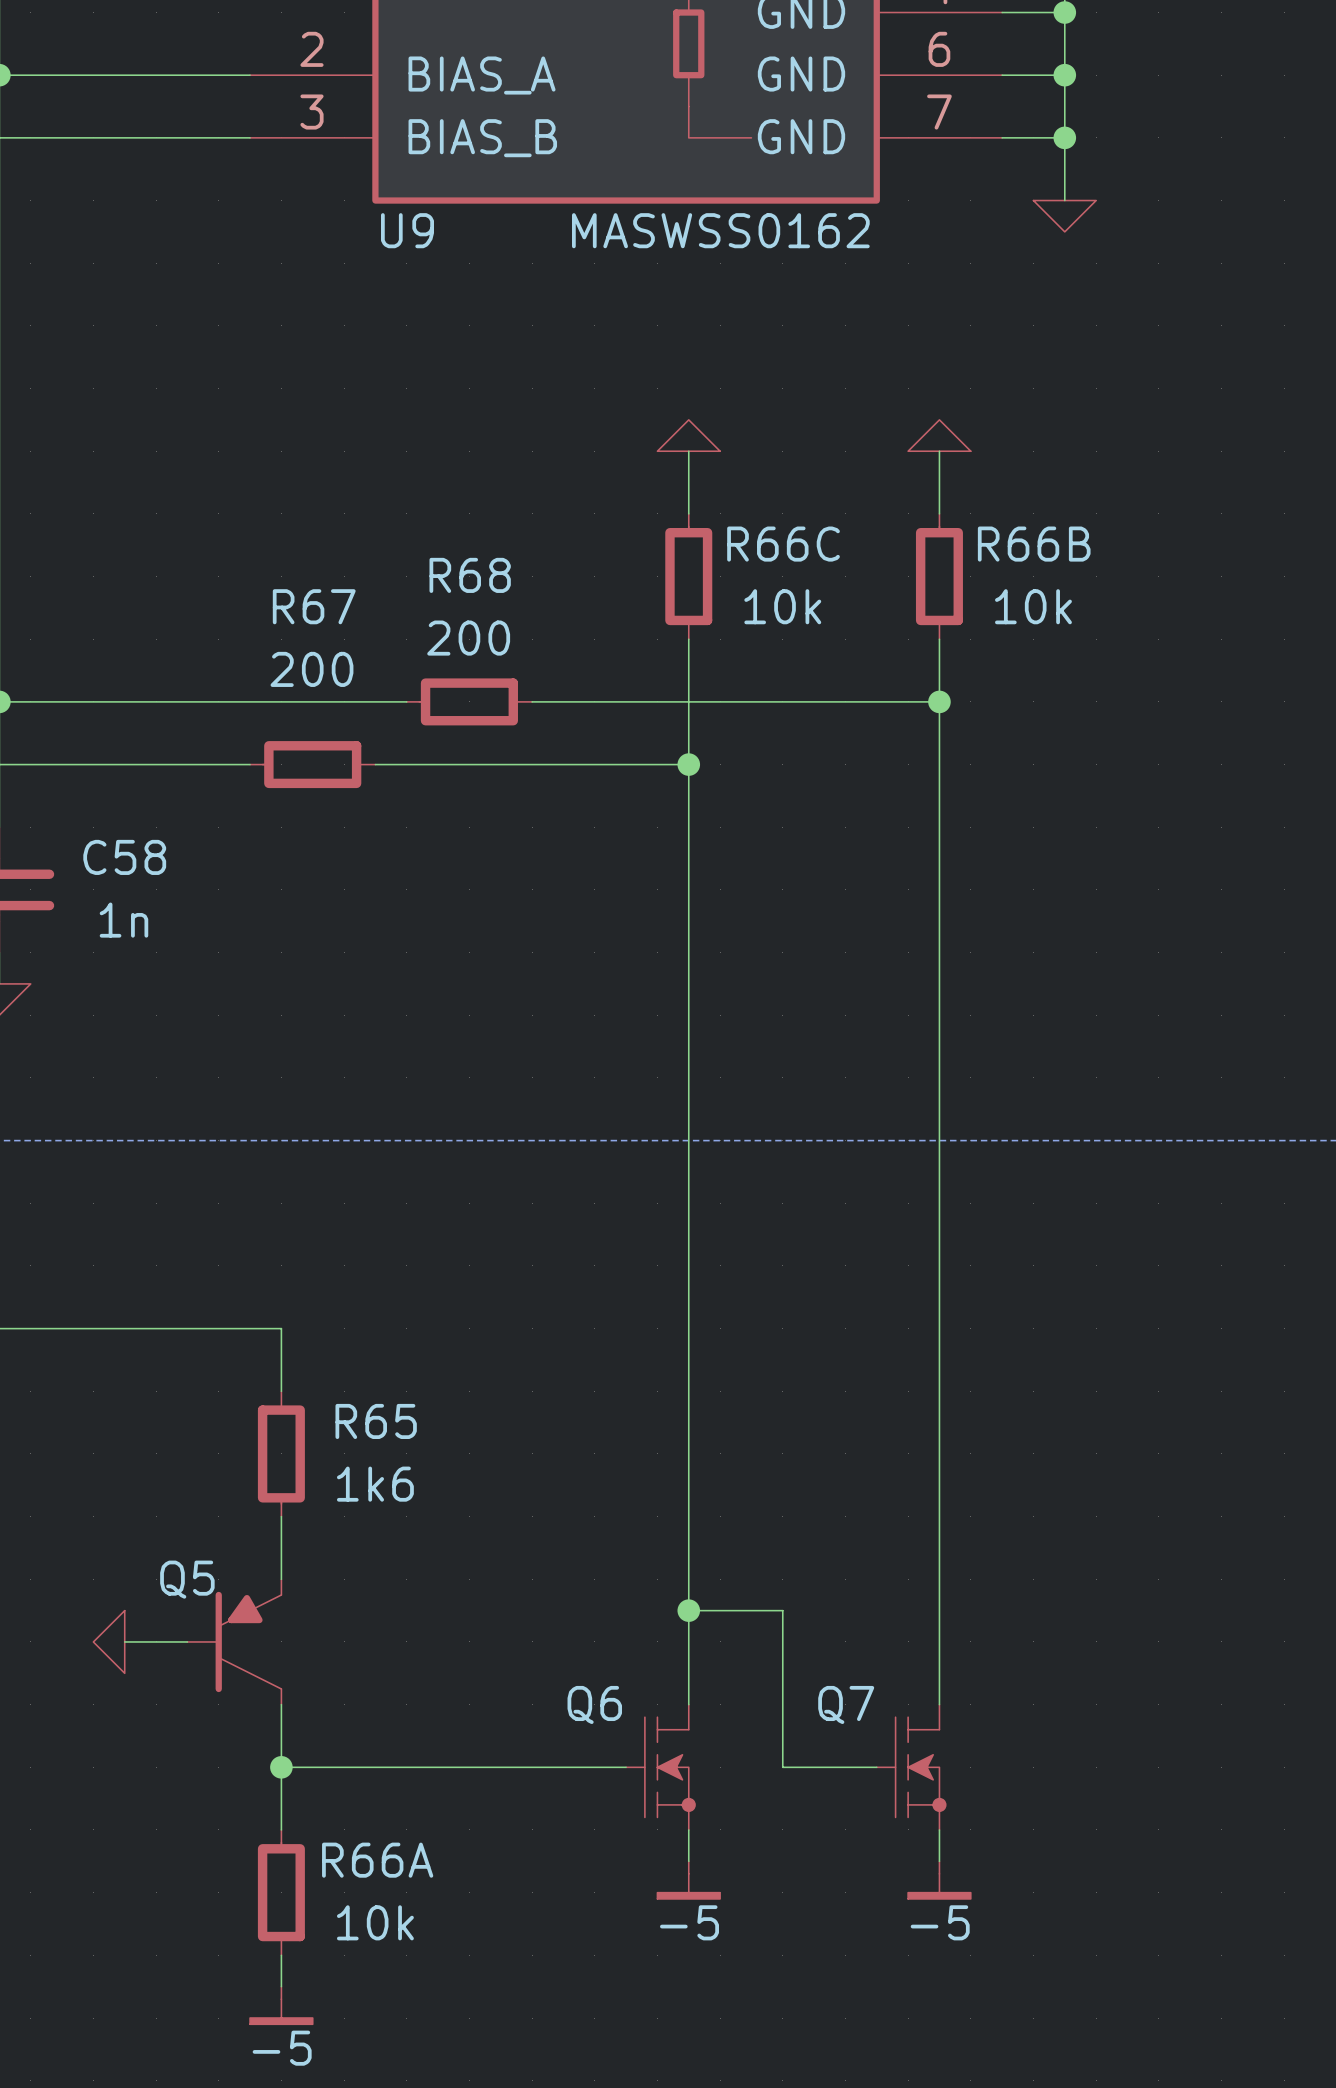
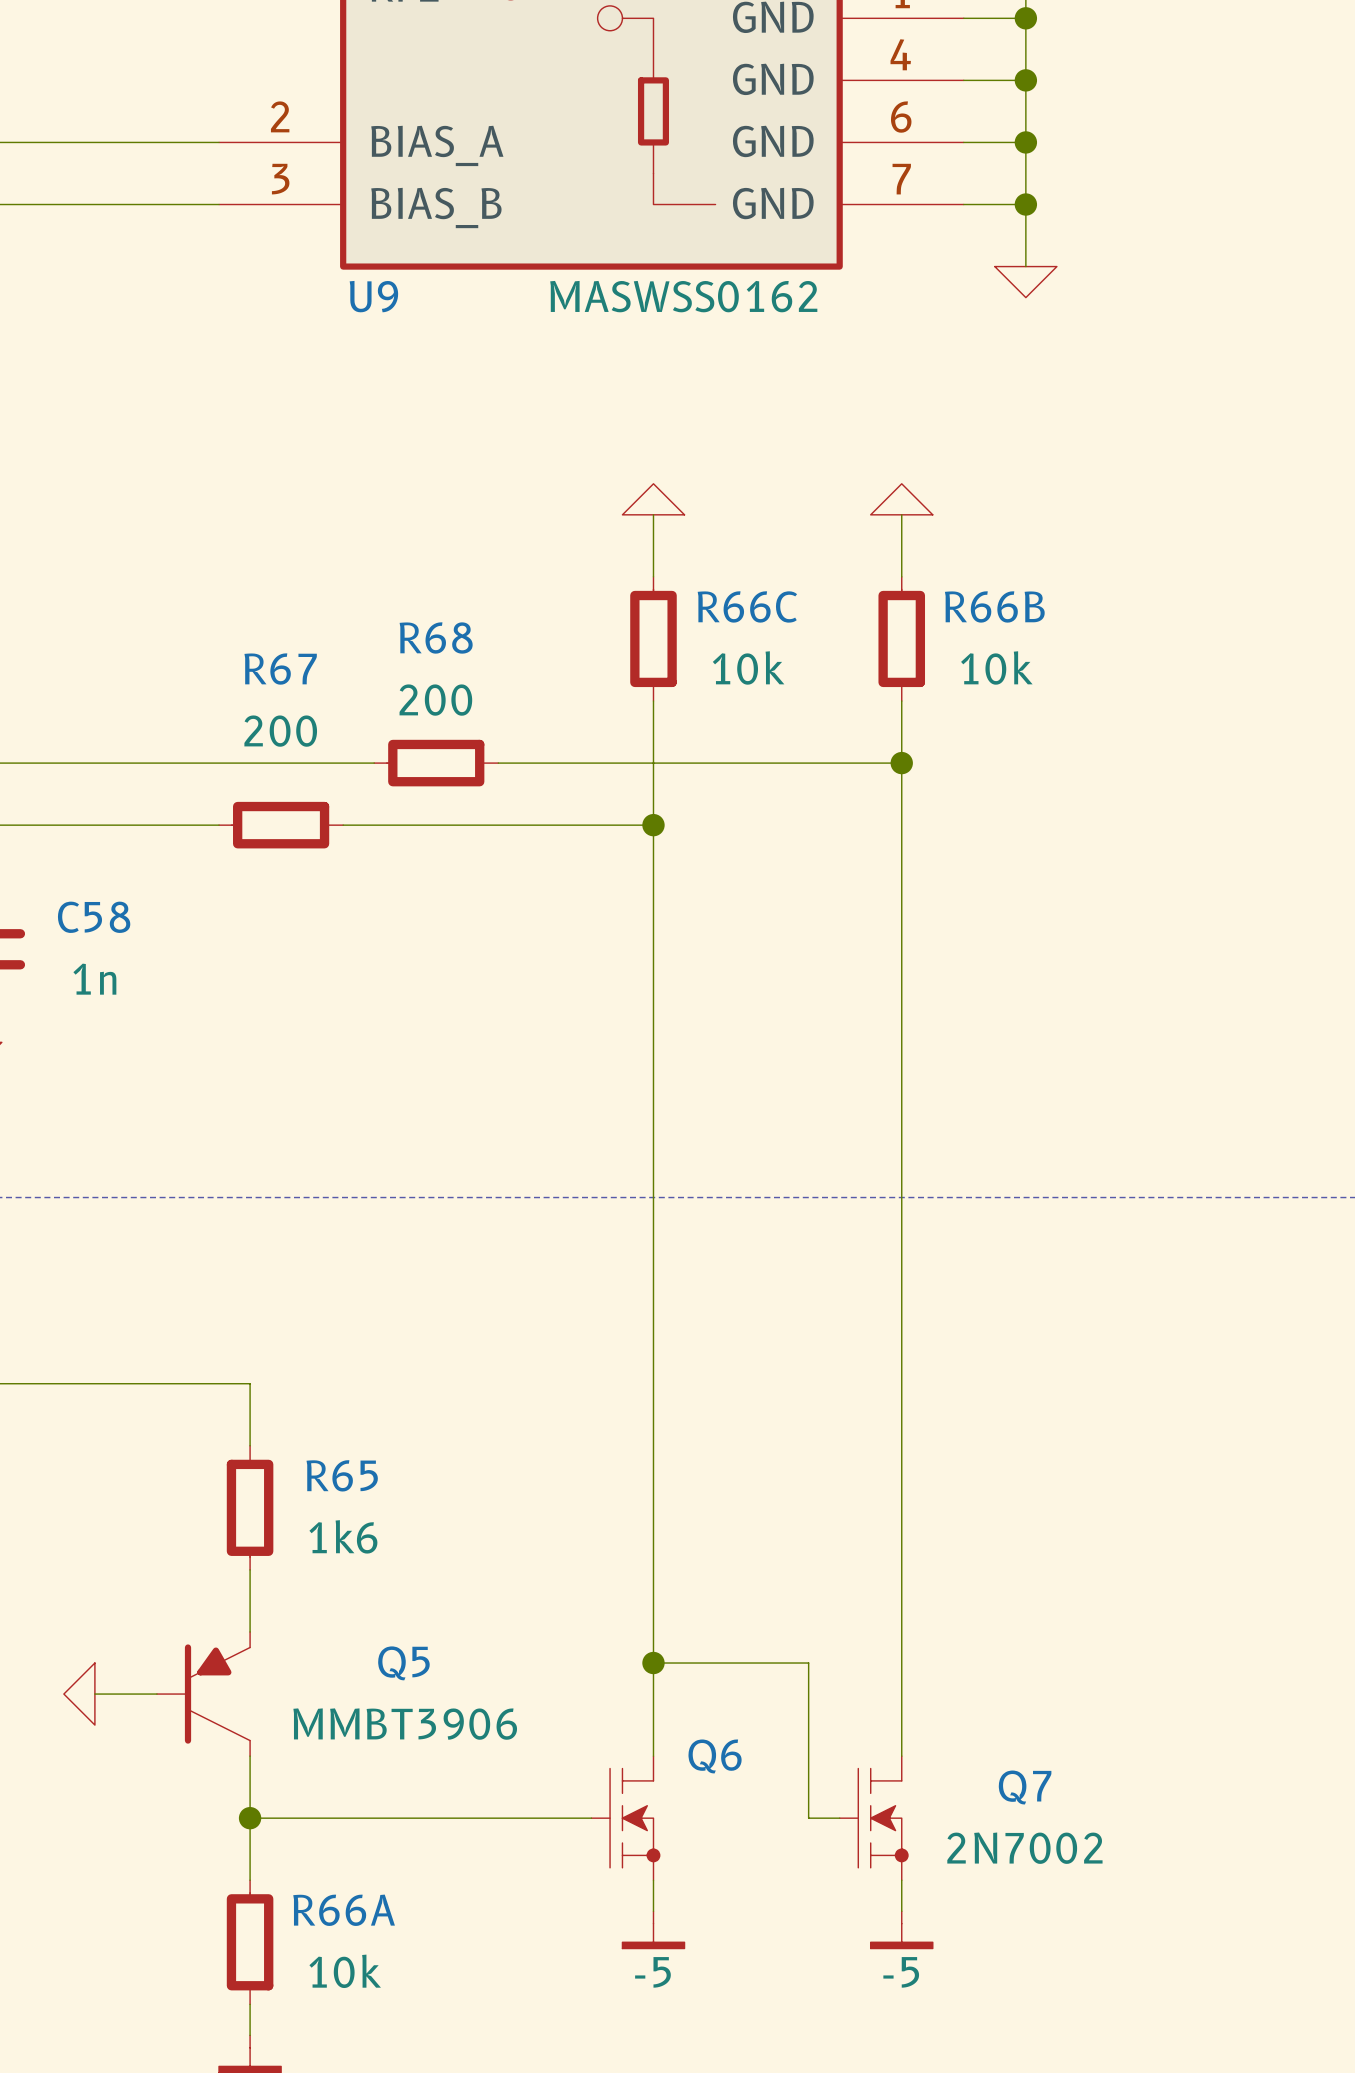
Q5 name position: Q5 (187, 1579) -> Q5 (403, 1663)
wire: (782, 1610) (782, 1767) (845, 1767) -> (746, 1663) (808, 1663) (808, 1818)
Q5 value: none -> MMBT3906 (405, 1724)
Q6 name position: Q6 (594, 1704) -> Q6 (715, 1756)
Q7 name position: Q7 (846, 1704) -> Q7 (1025, 1787)
Q7 value: none -> 2N7002 (1024, 1848)

